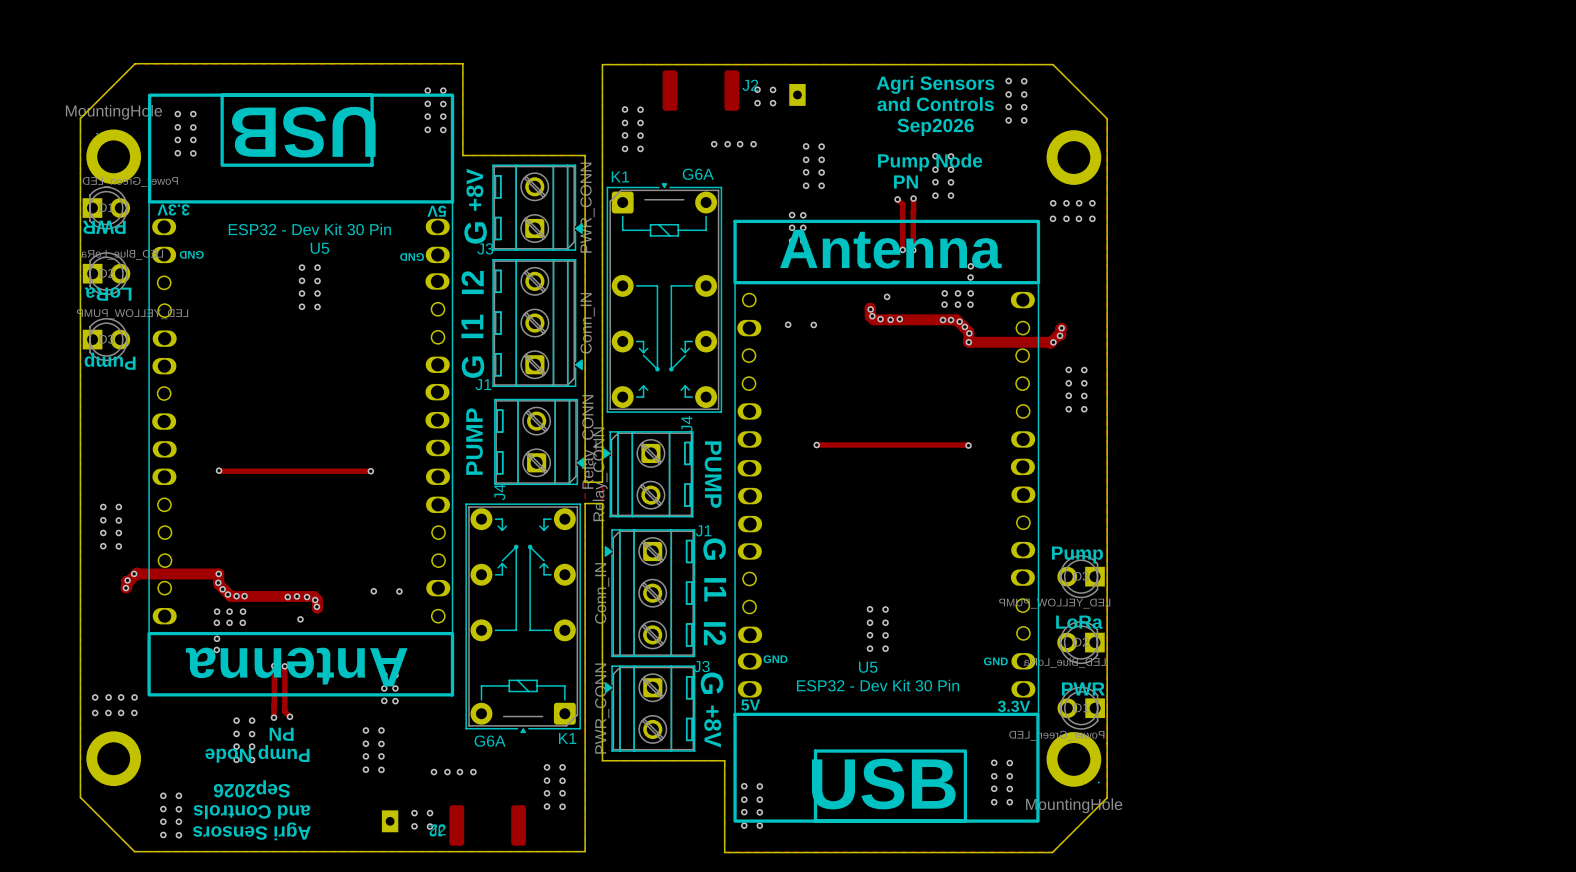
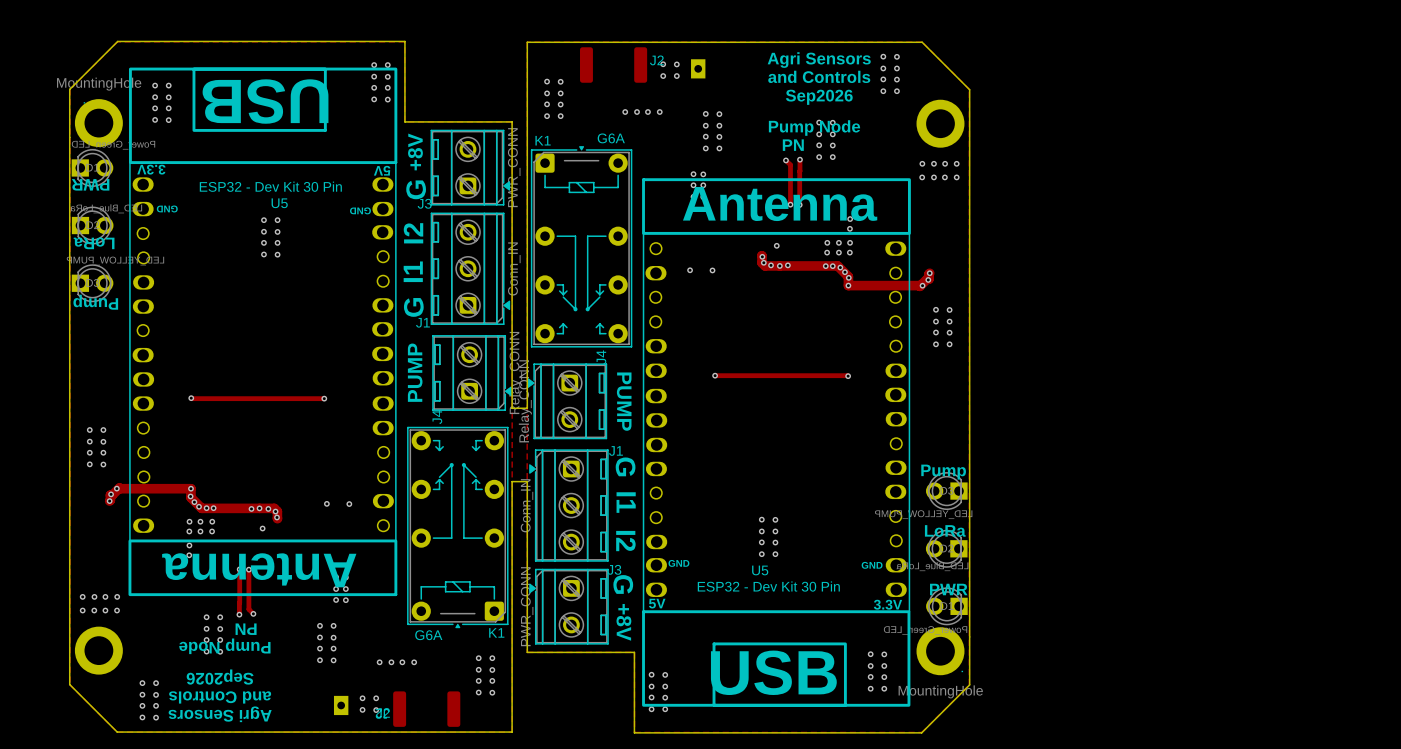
board edge: (585, 565) (585, 503) (602, 503) (602, 565) -> (512, 481) (527, 481)

